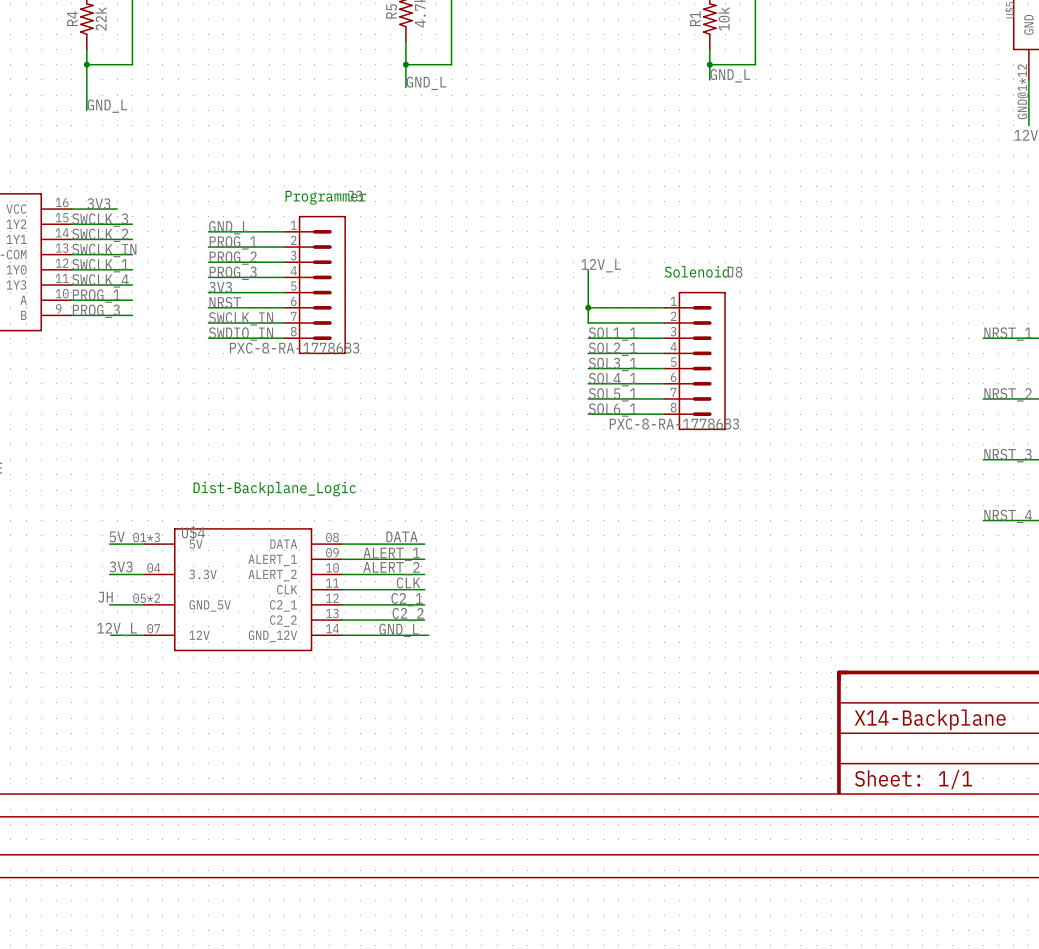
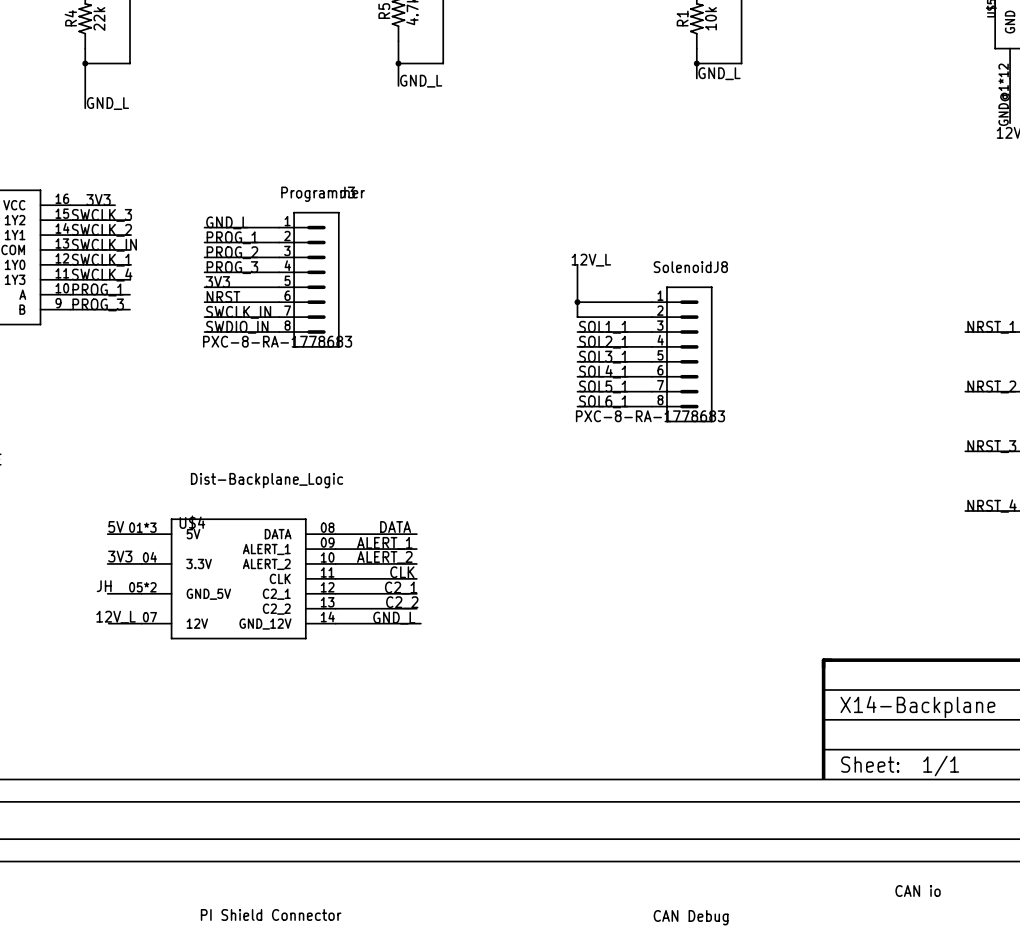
text: none -> CAN io (918, 891)
text: none -> PI Shield Connector (271, 914)
text: none -> CAN Debug (691, 917)

